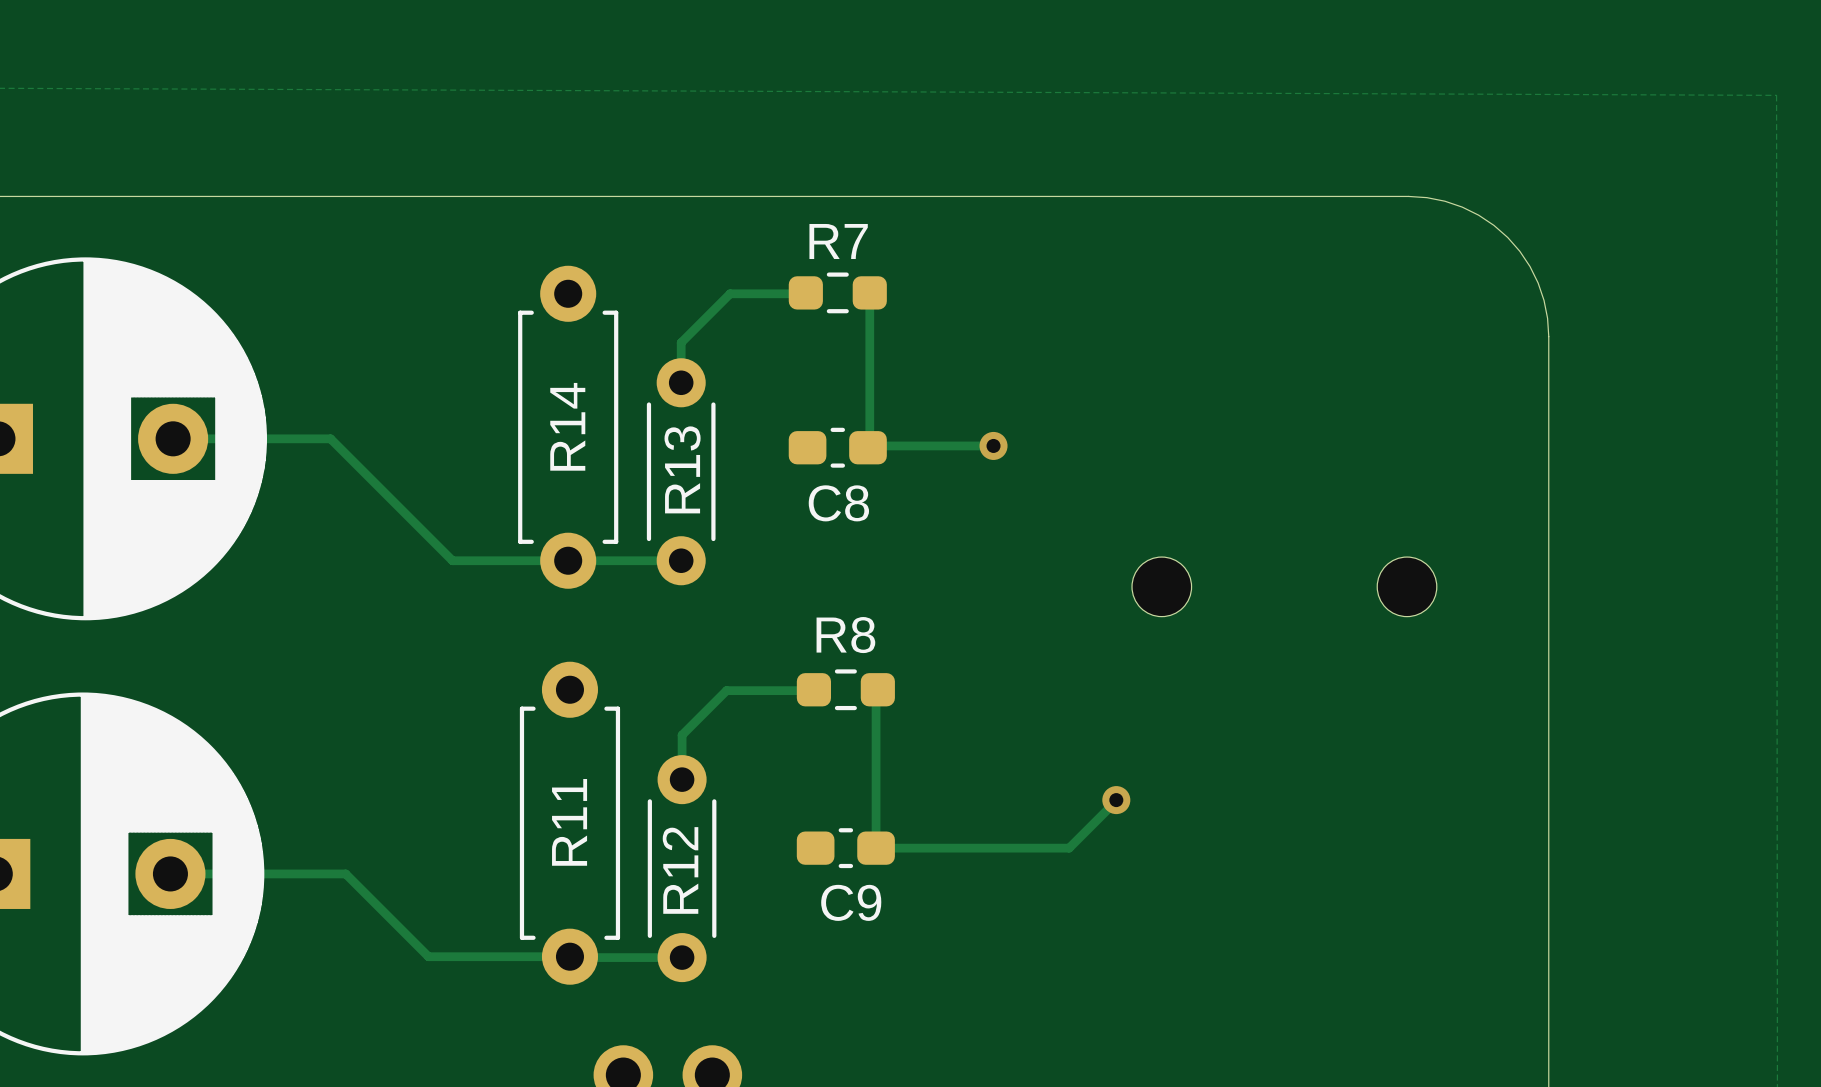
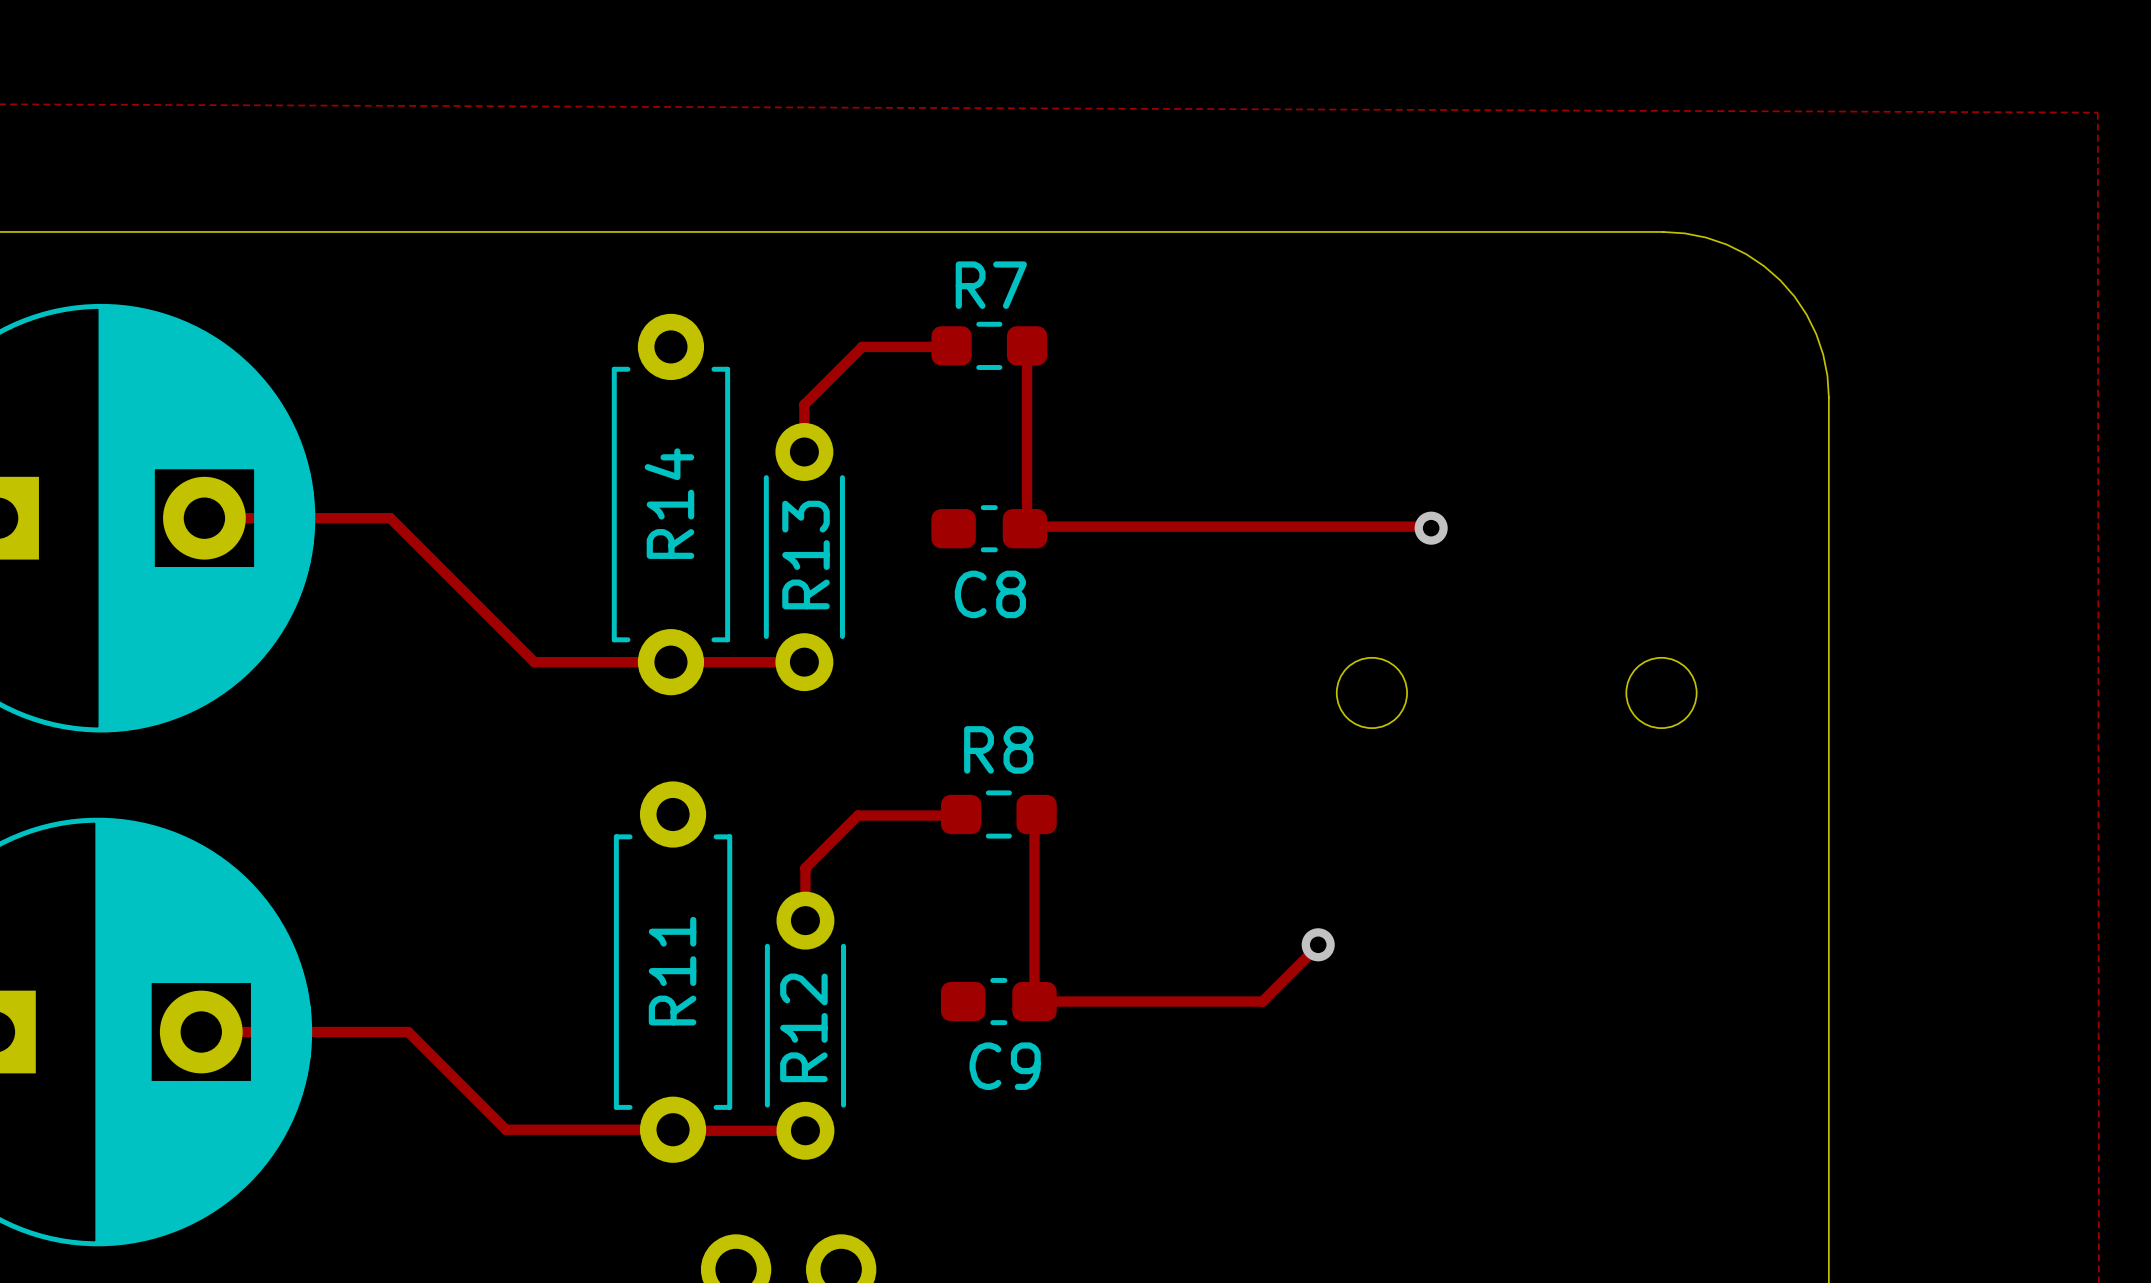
track: none -> (1173, 526) (1429, 526) (1431, 528)
via: (993, 445) -> none
via: none -> (1431, 528)

